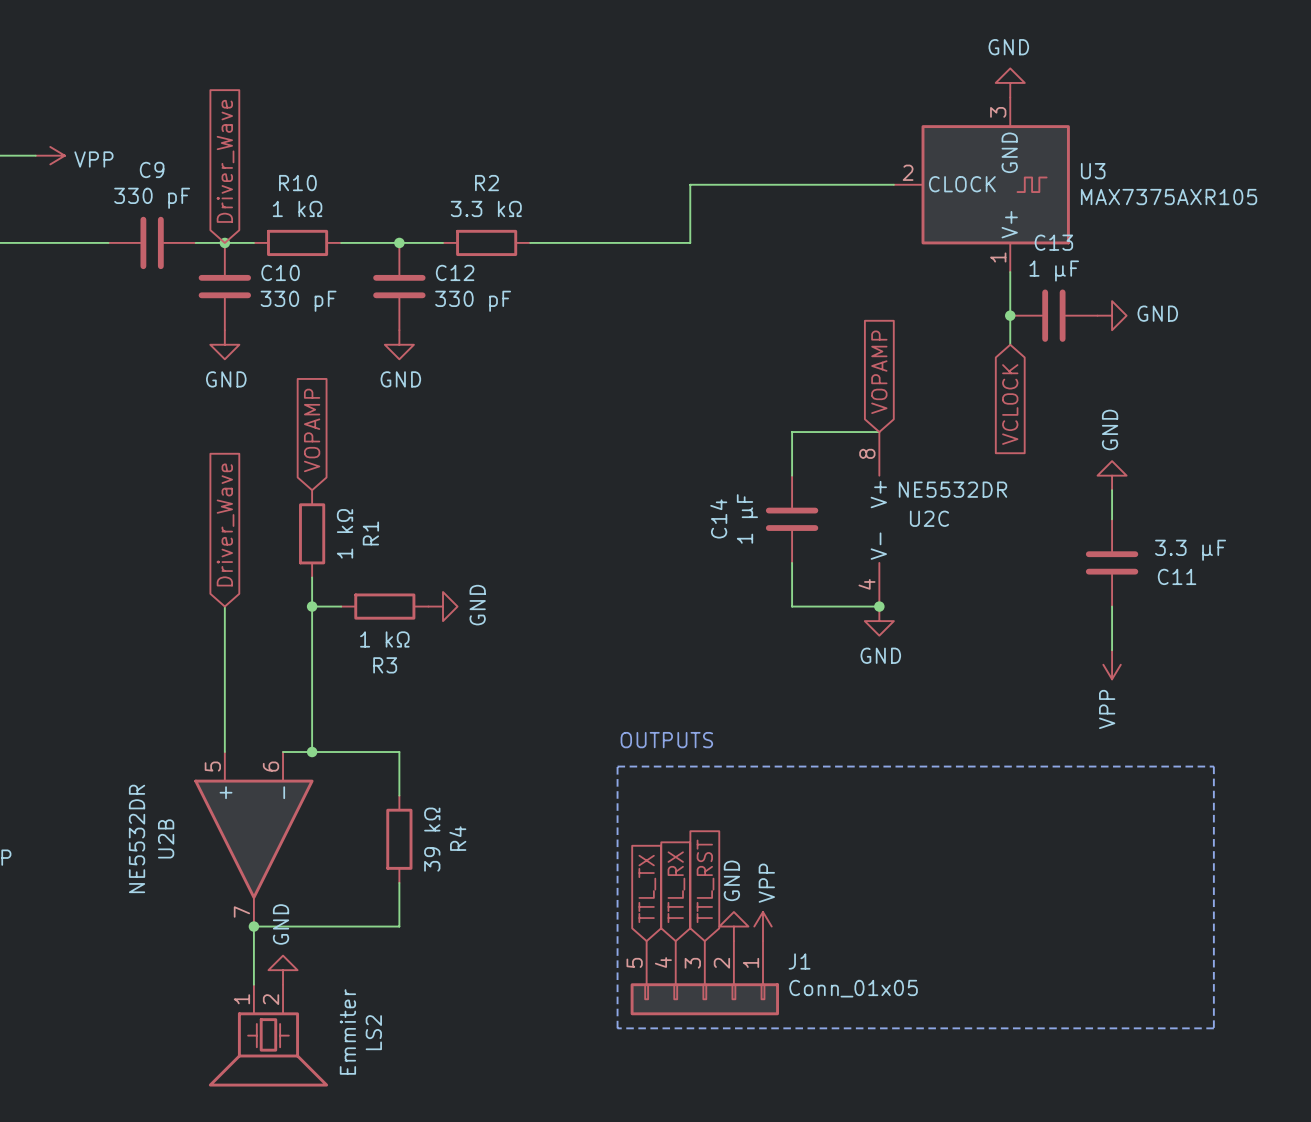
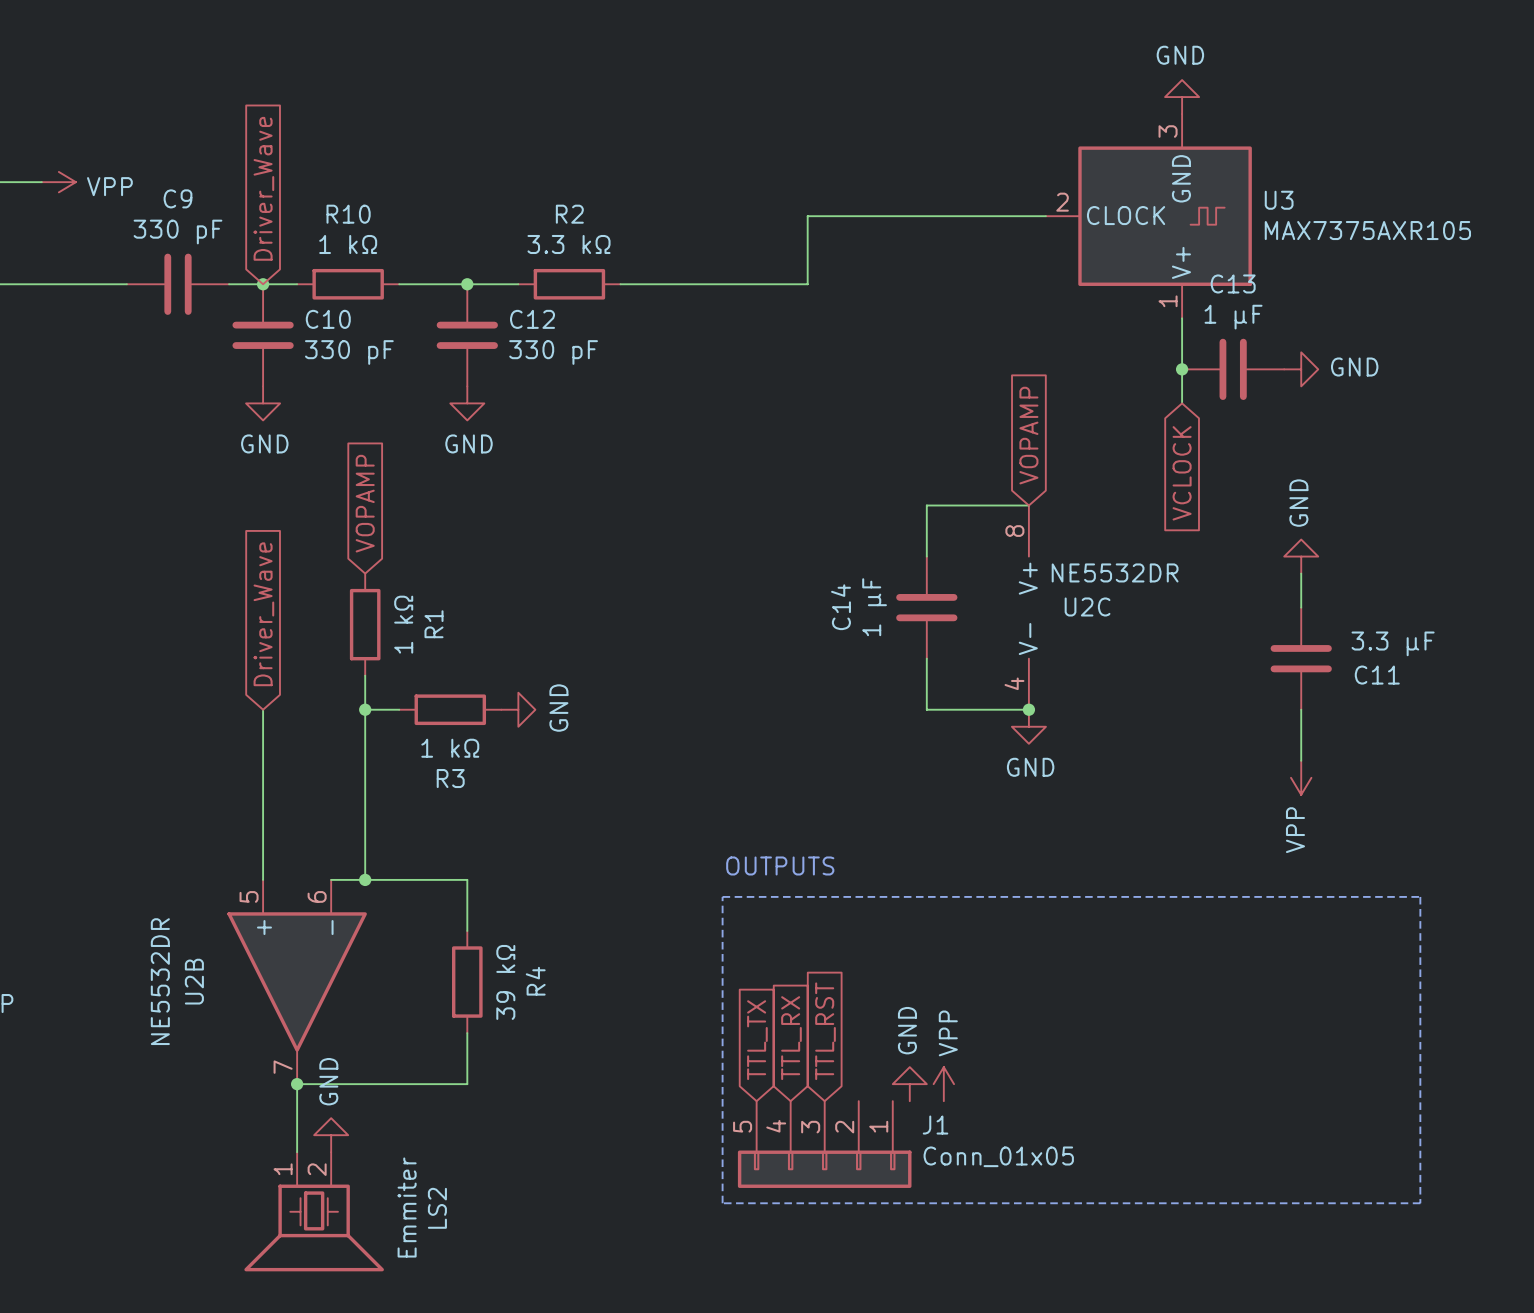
power symbol position: GND (733, 926) -> GND (909, 1084)
power symbol position: VPP (762, 926) -> VPP (943, 1084)

